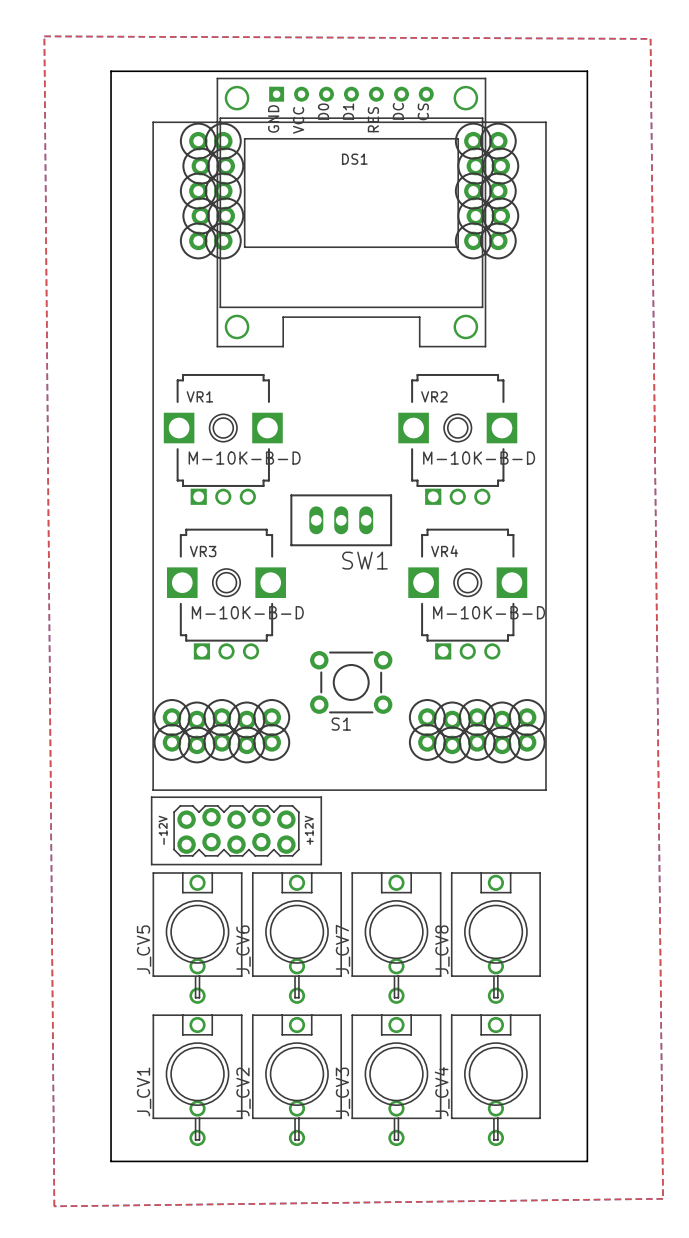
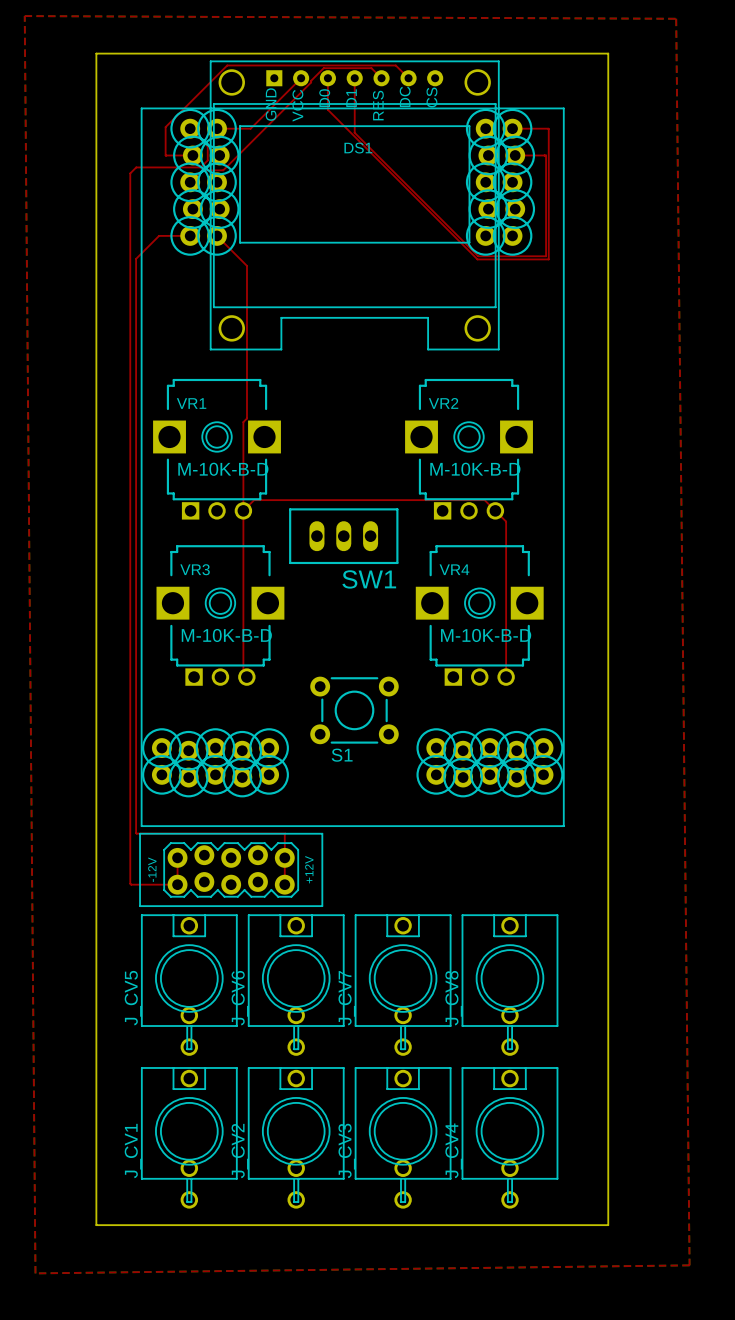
top track: none -> (301, 78) (250, 128) (217, 128)
top track: none -> (327, 78) (327, 109) (477, 259) (548, 259) (548, 129) (512, 128)
top track: none -> (354, 78) (354, 132)
top track: none -> (381, 78) (371, 68) (323, 68) (223, 170) (202, 170) (190, 182)
top track: none -> (408, 78) (395, 65) (227, 65) (165, 127) (165, 155) (192, 155)
top track: none -> (190, 128) (207, 146) (207, 160) (200, 167) (136, 167) (130, 173) (130, 883) (177, 884) (177, 857)
top track: none -> (354, 132) (478, 256) (546, 256) (546, 155) (515, 155)
top track: none -> (190, 235) (159, 235) (136, 258) (136, 833) (285, 833) (284, 884)
top track: none -> (217, 235) (246, 265) (246, 418) (243, 422) (243, 673) (246, 677)
top track: none -> (243, 510) (254, 500) (484, 500) (506, 521) (506, 677)

